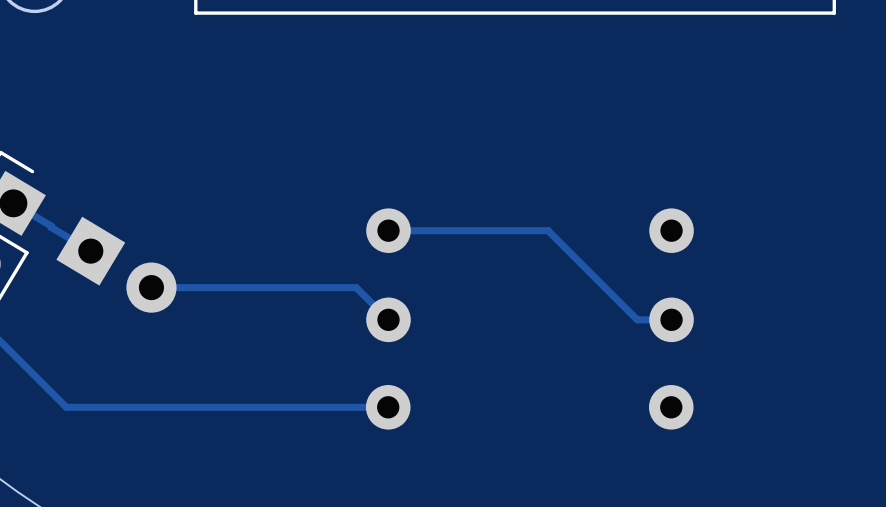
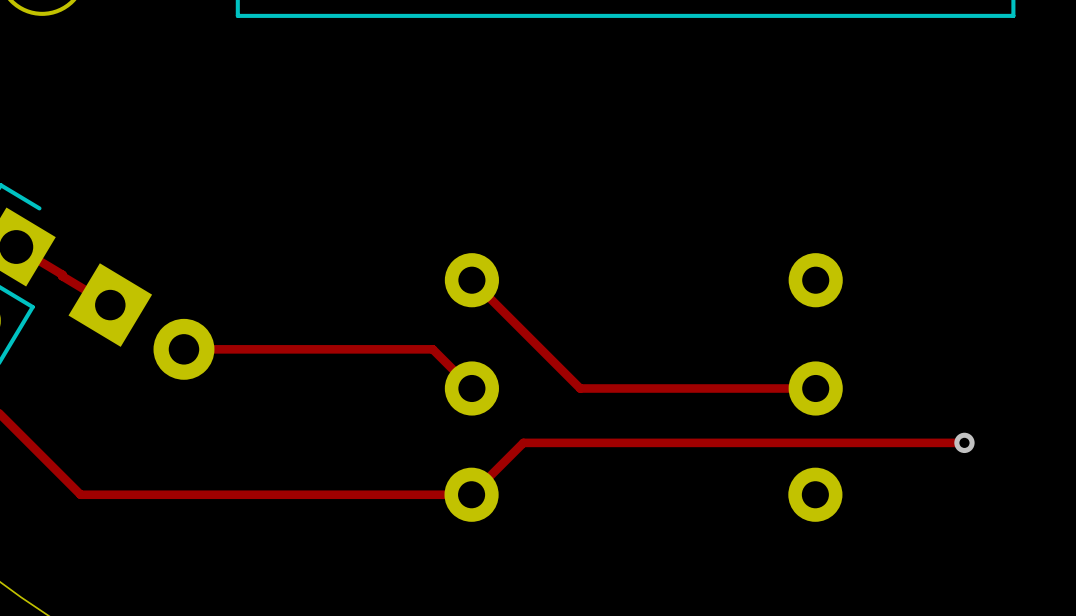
track: (388, 230) (548, 230) (637, 319) -> (471, 280) (580, 388) (774, 388)
track: none -> (964, 442) (523, 442) (471, 494)
via: none -> (964, 442)

